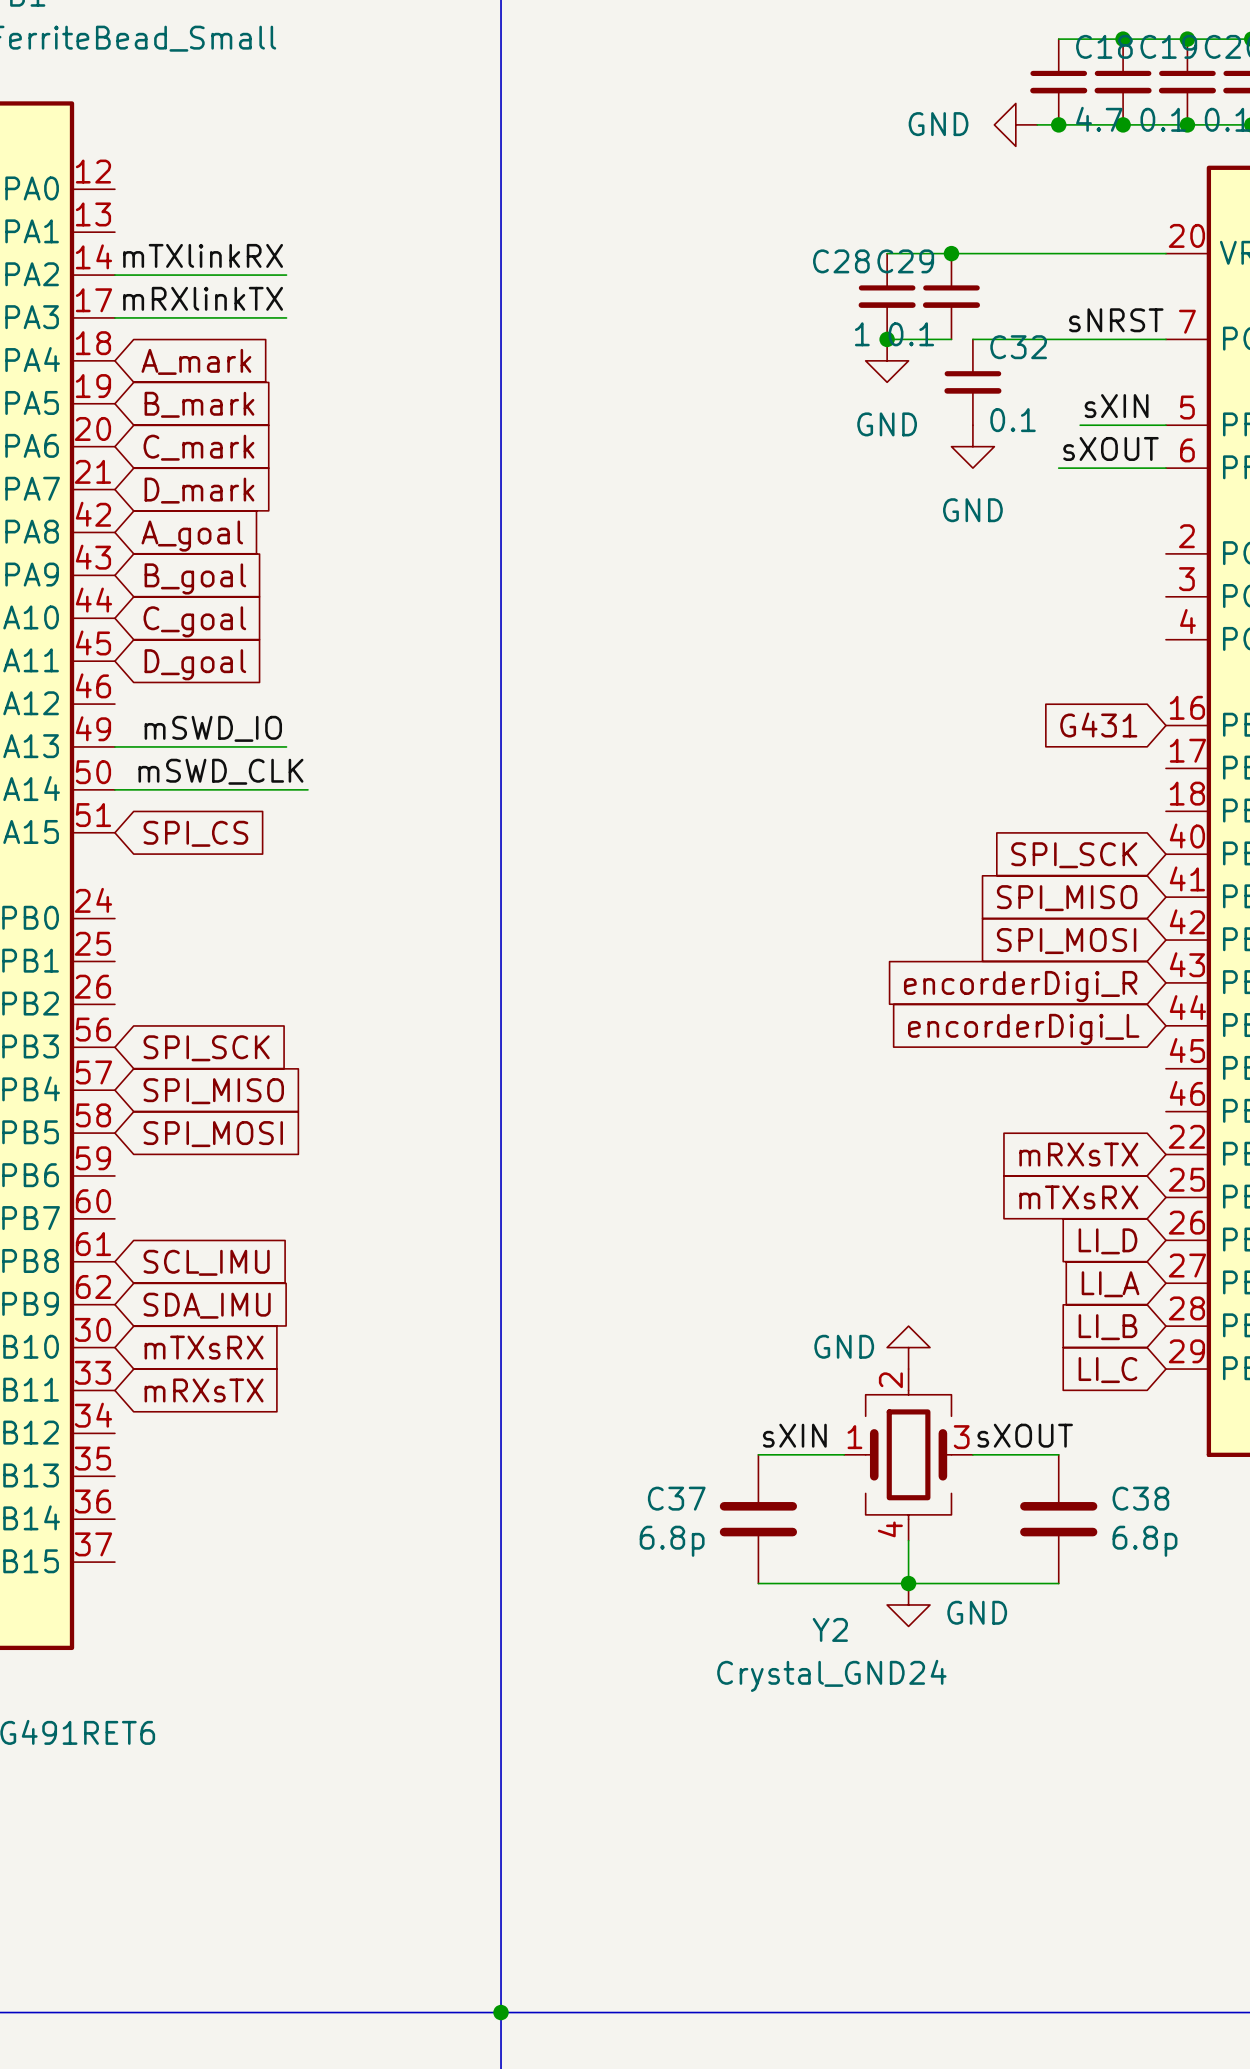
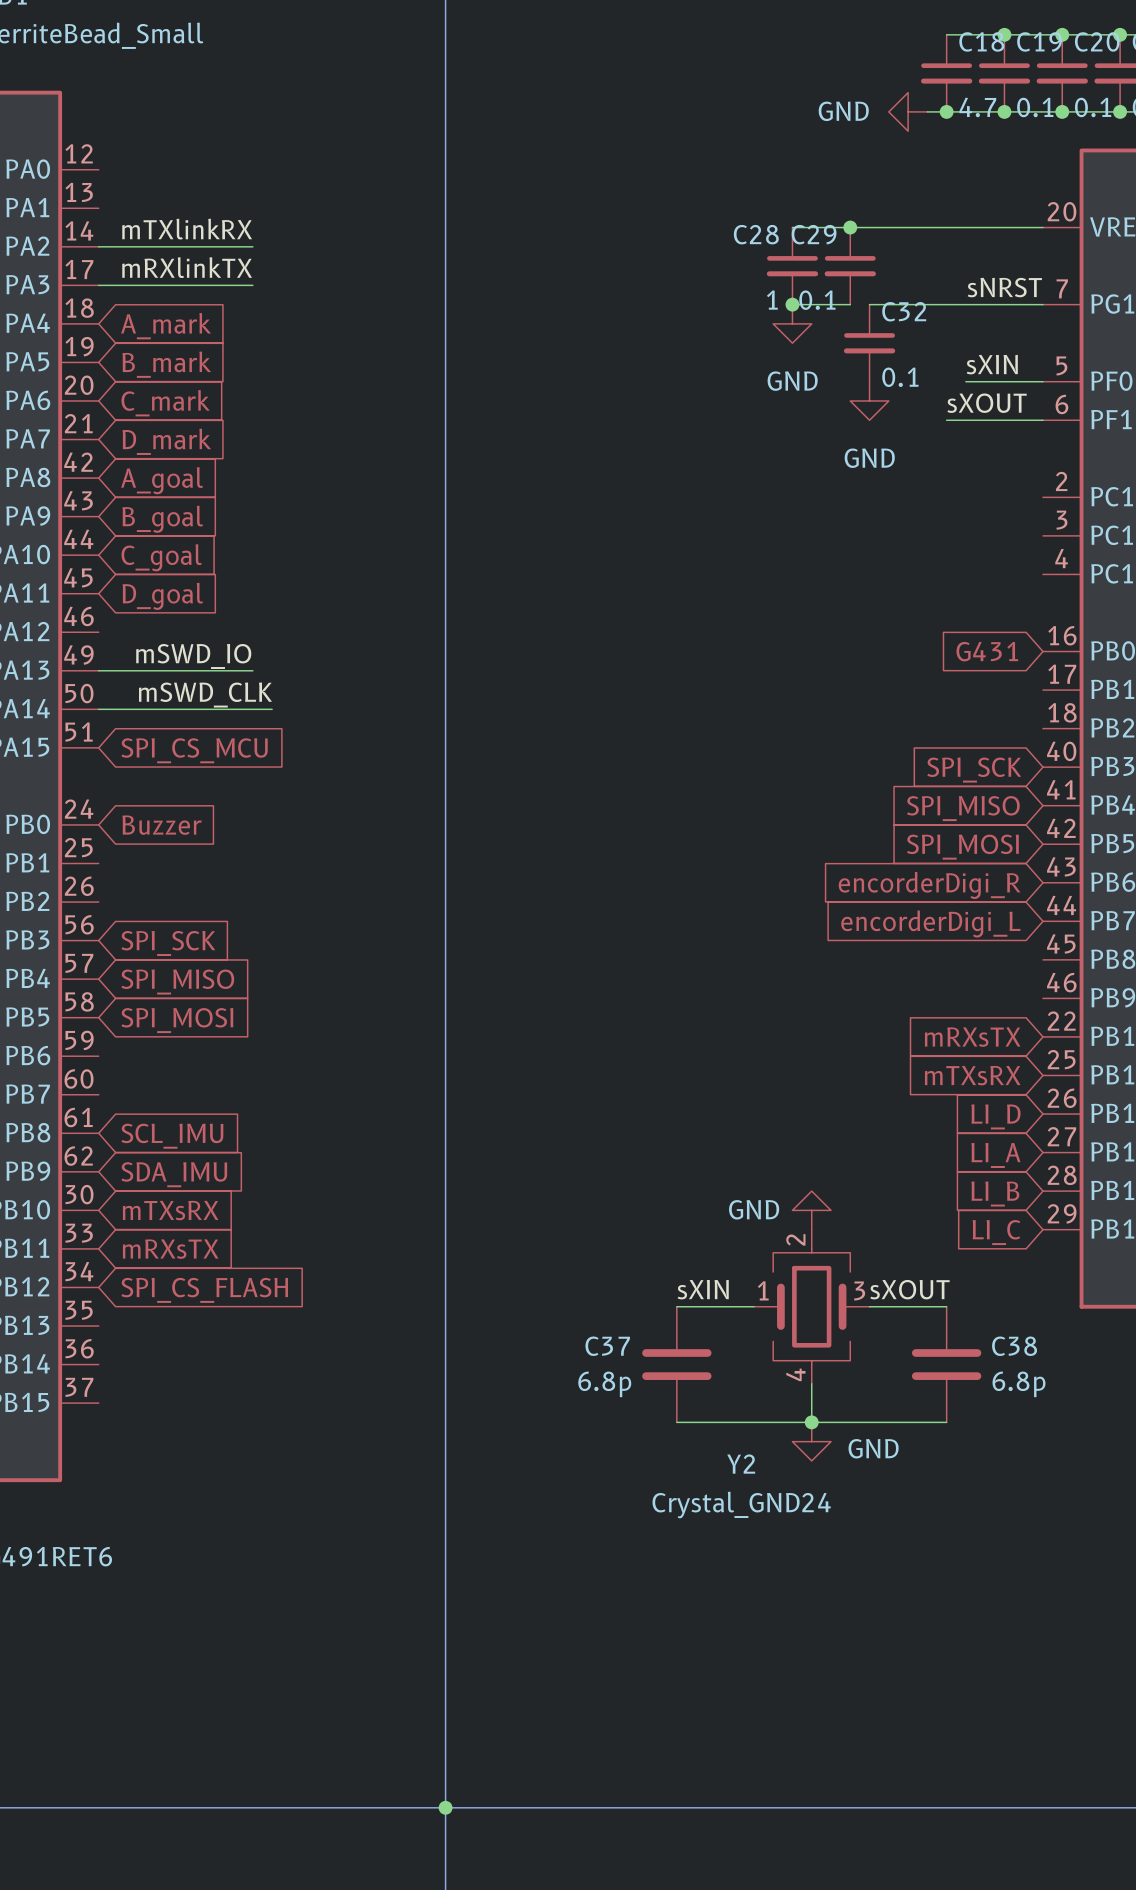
global label: SPI_CS (195, 833) -> SPI_CS_MCU (194, 750)
global label: none -> Buzzer (161, 825)
global label: none -> SPI_CS_FLASH (204, 1290)

